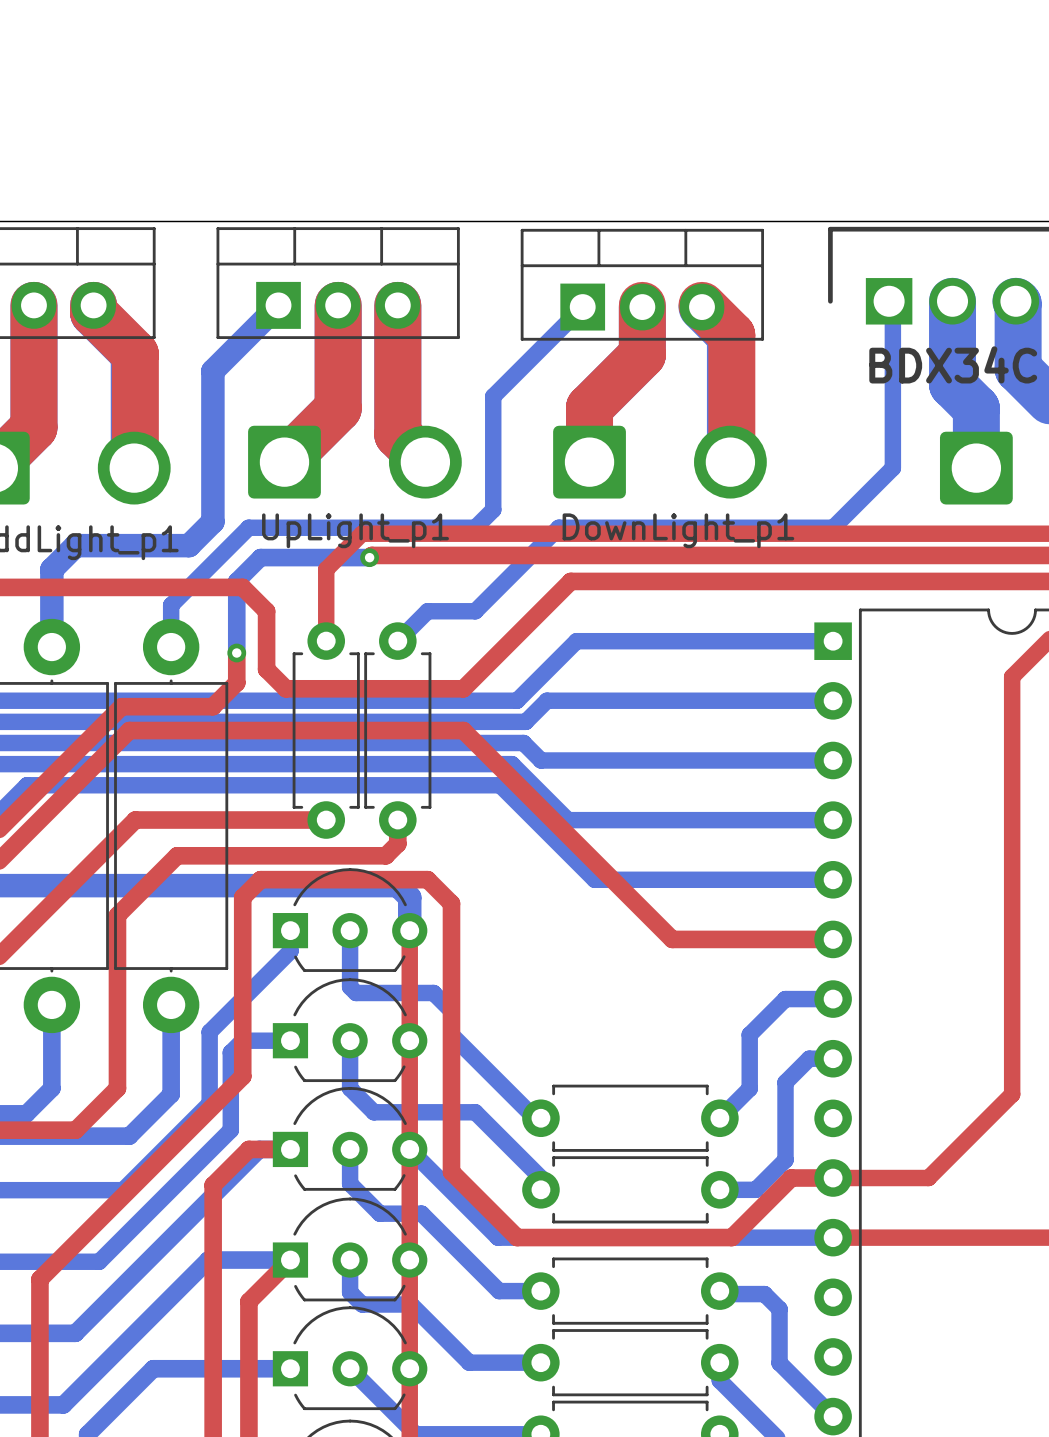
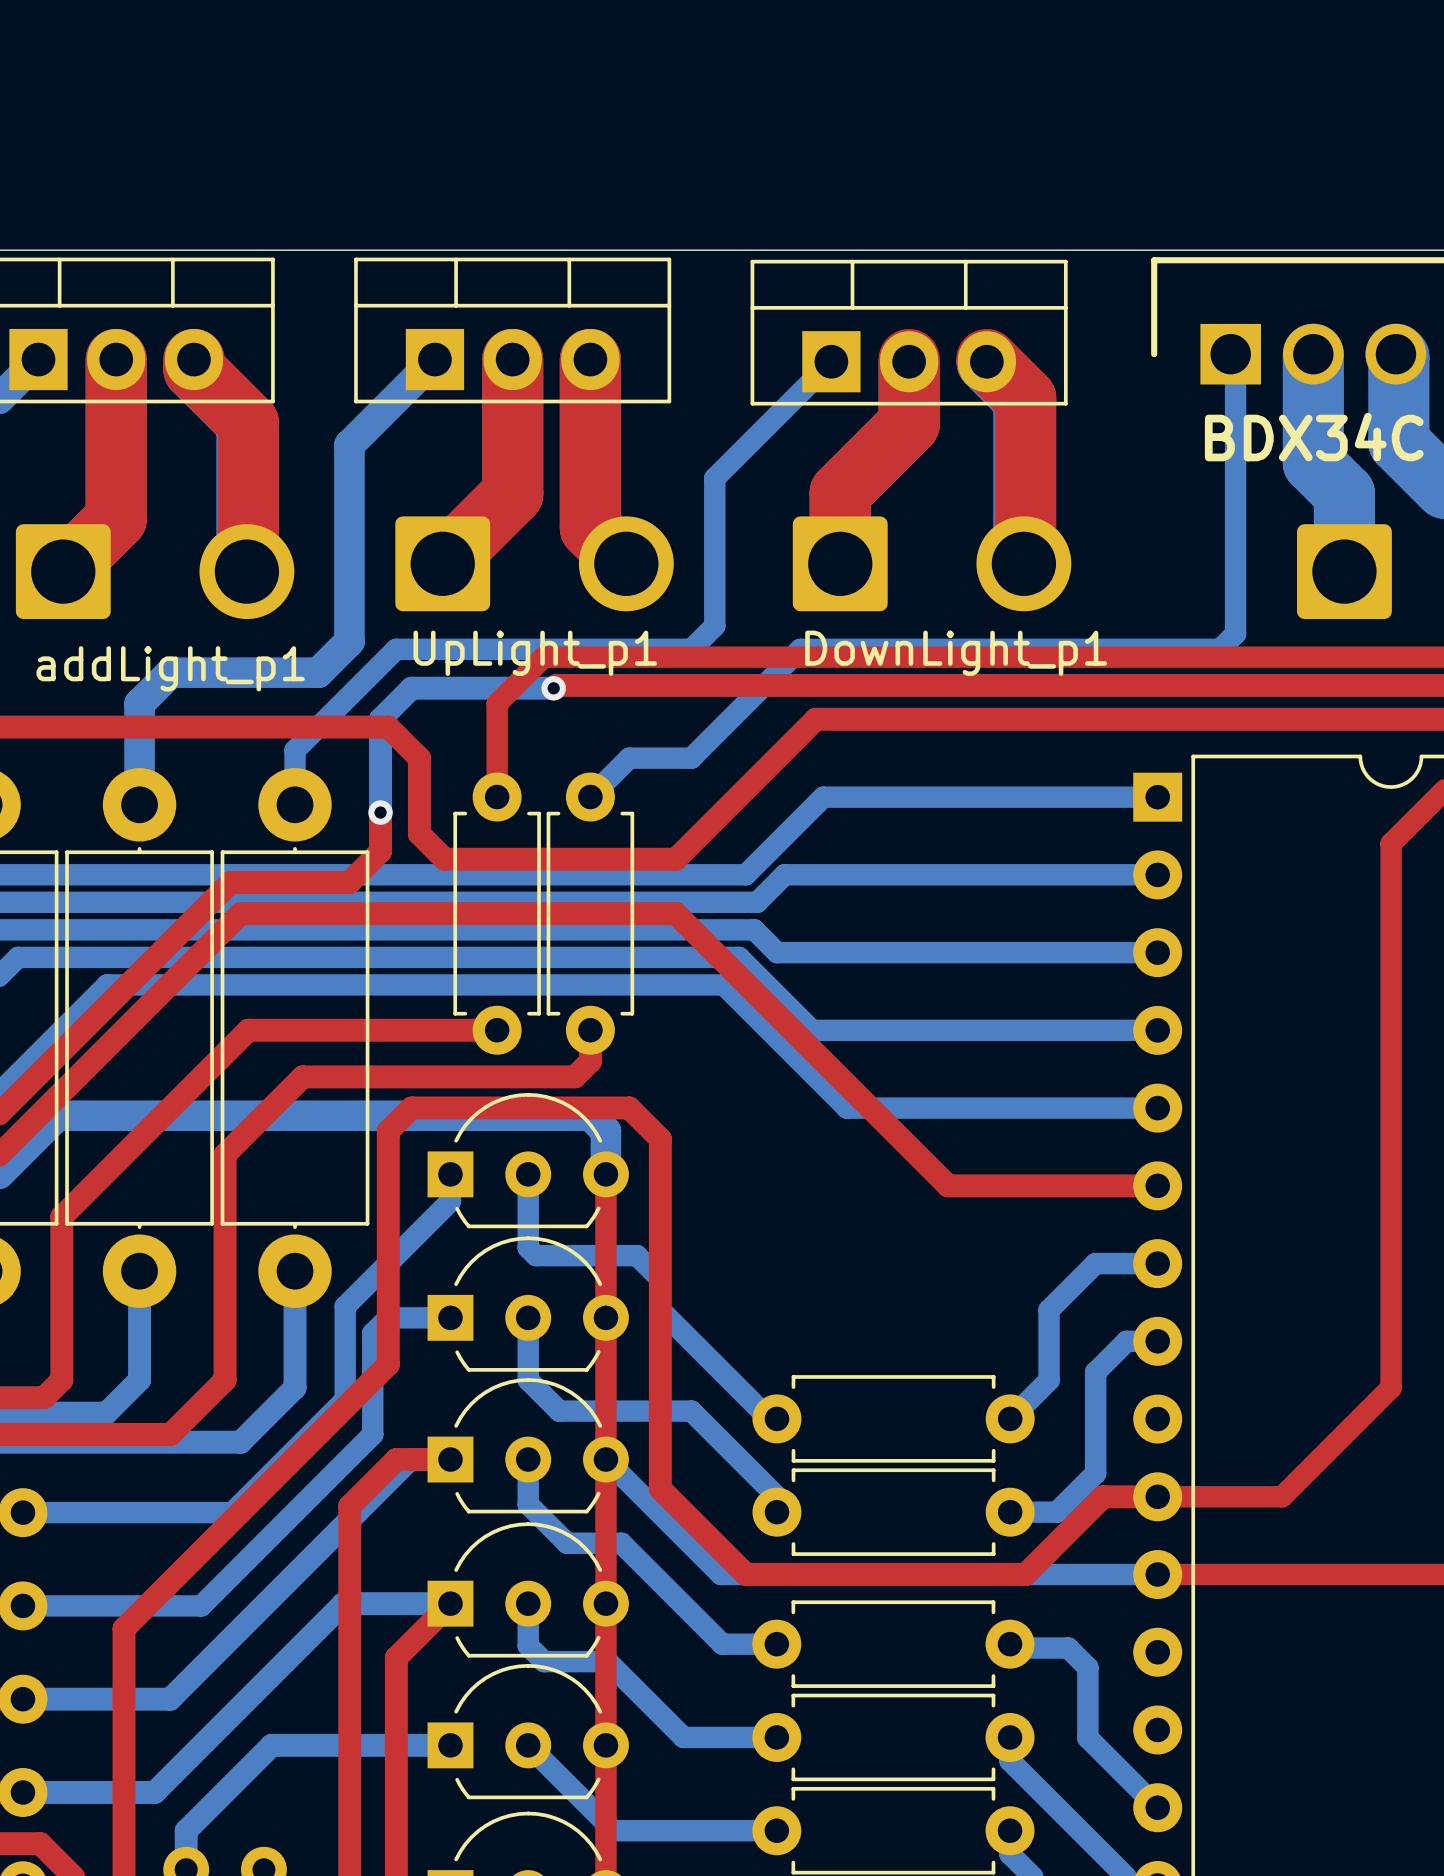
bottom track: (892, 468) (833, 527) -> (1235, 571) (1235, 633) (1220, 649) (1157, 649)

